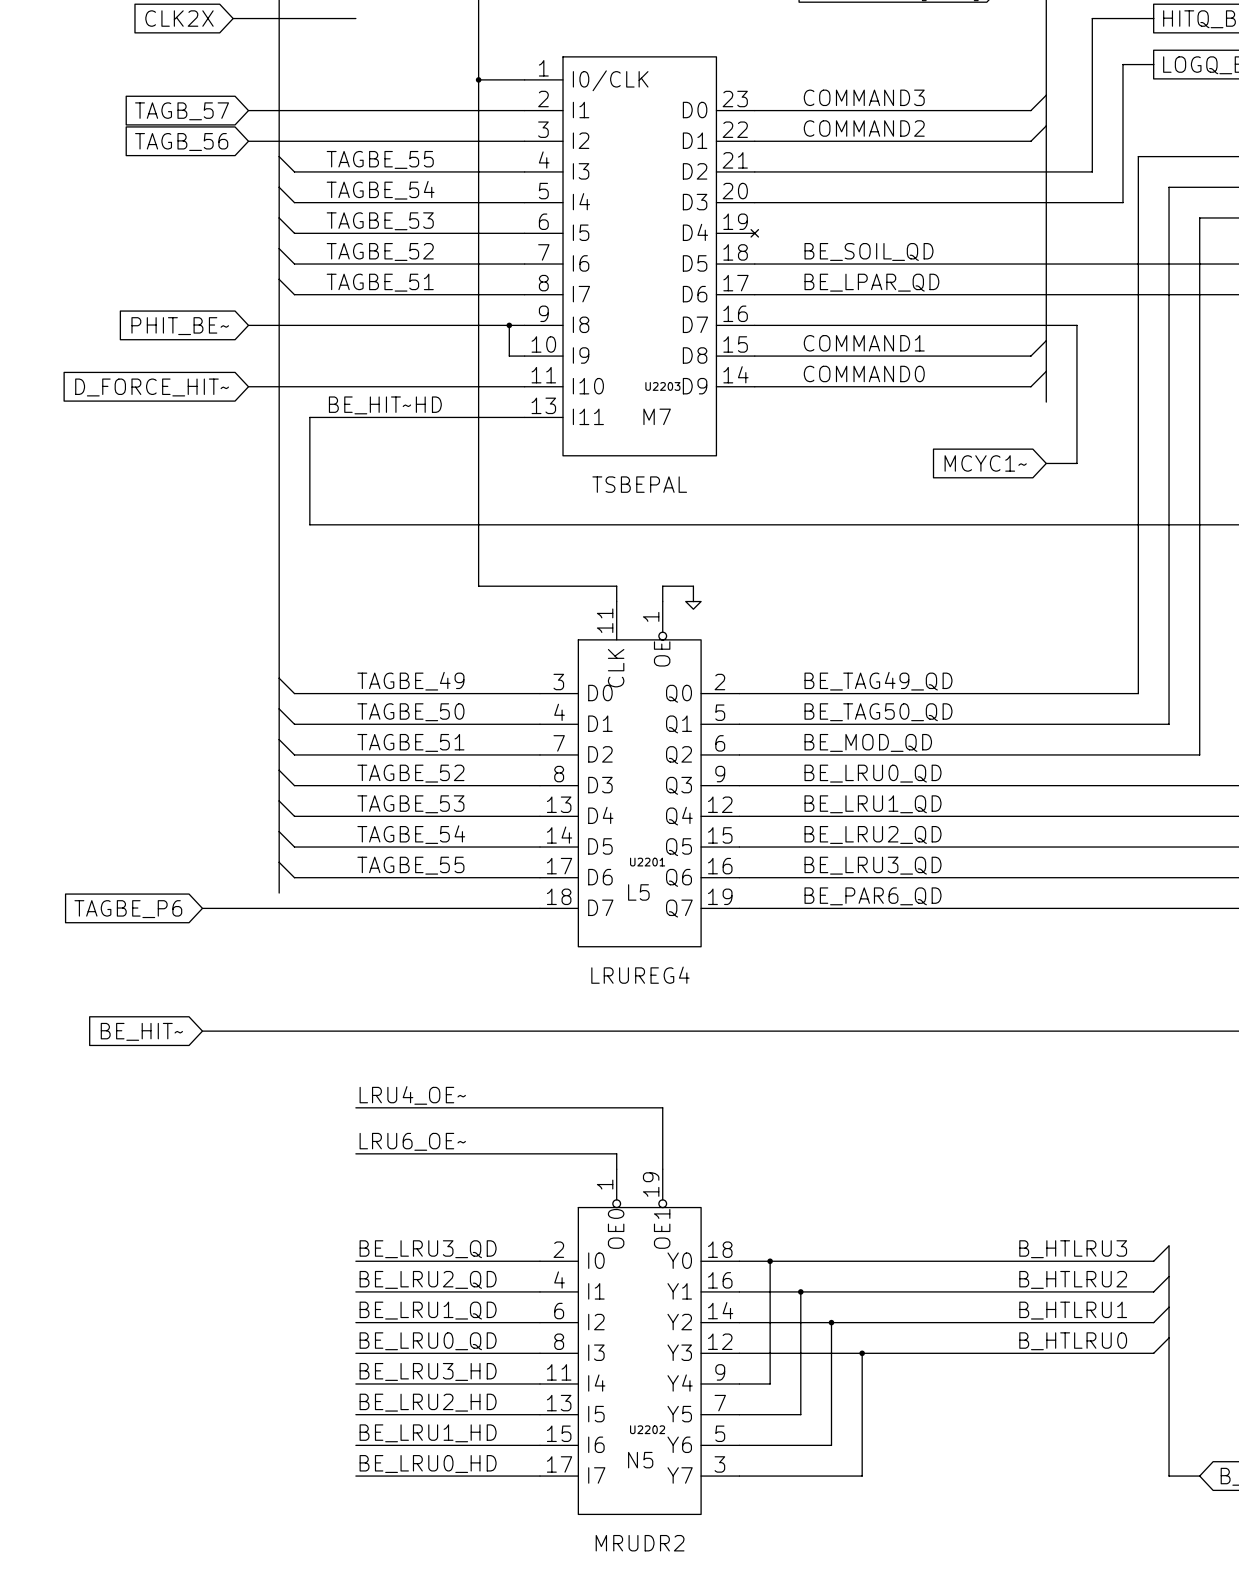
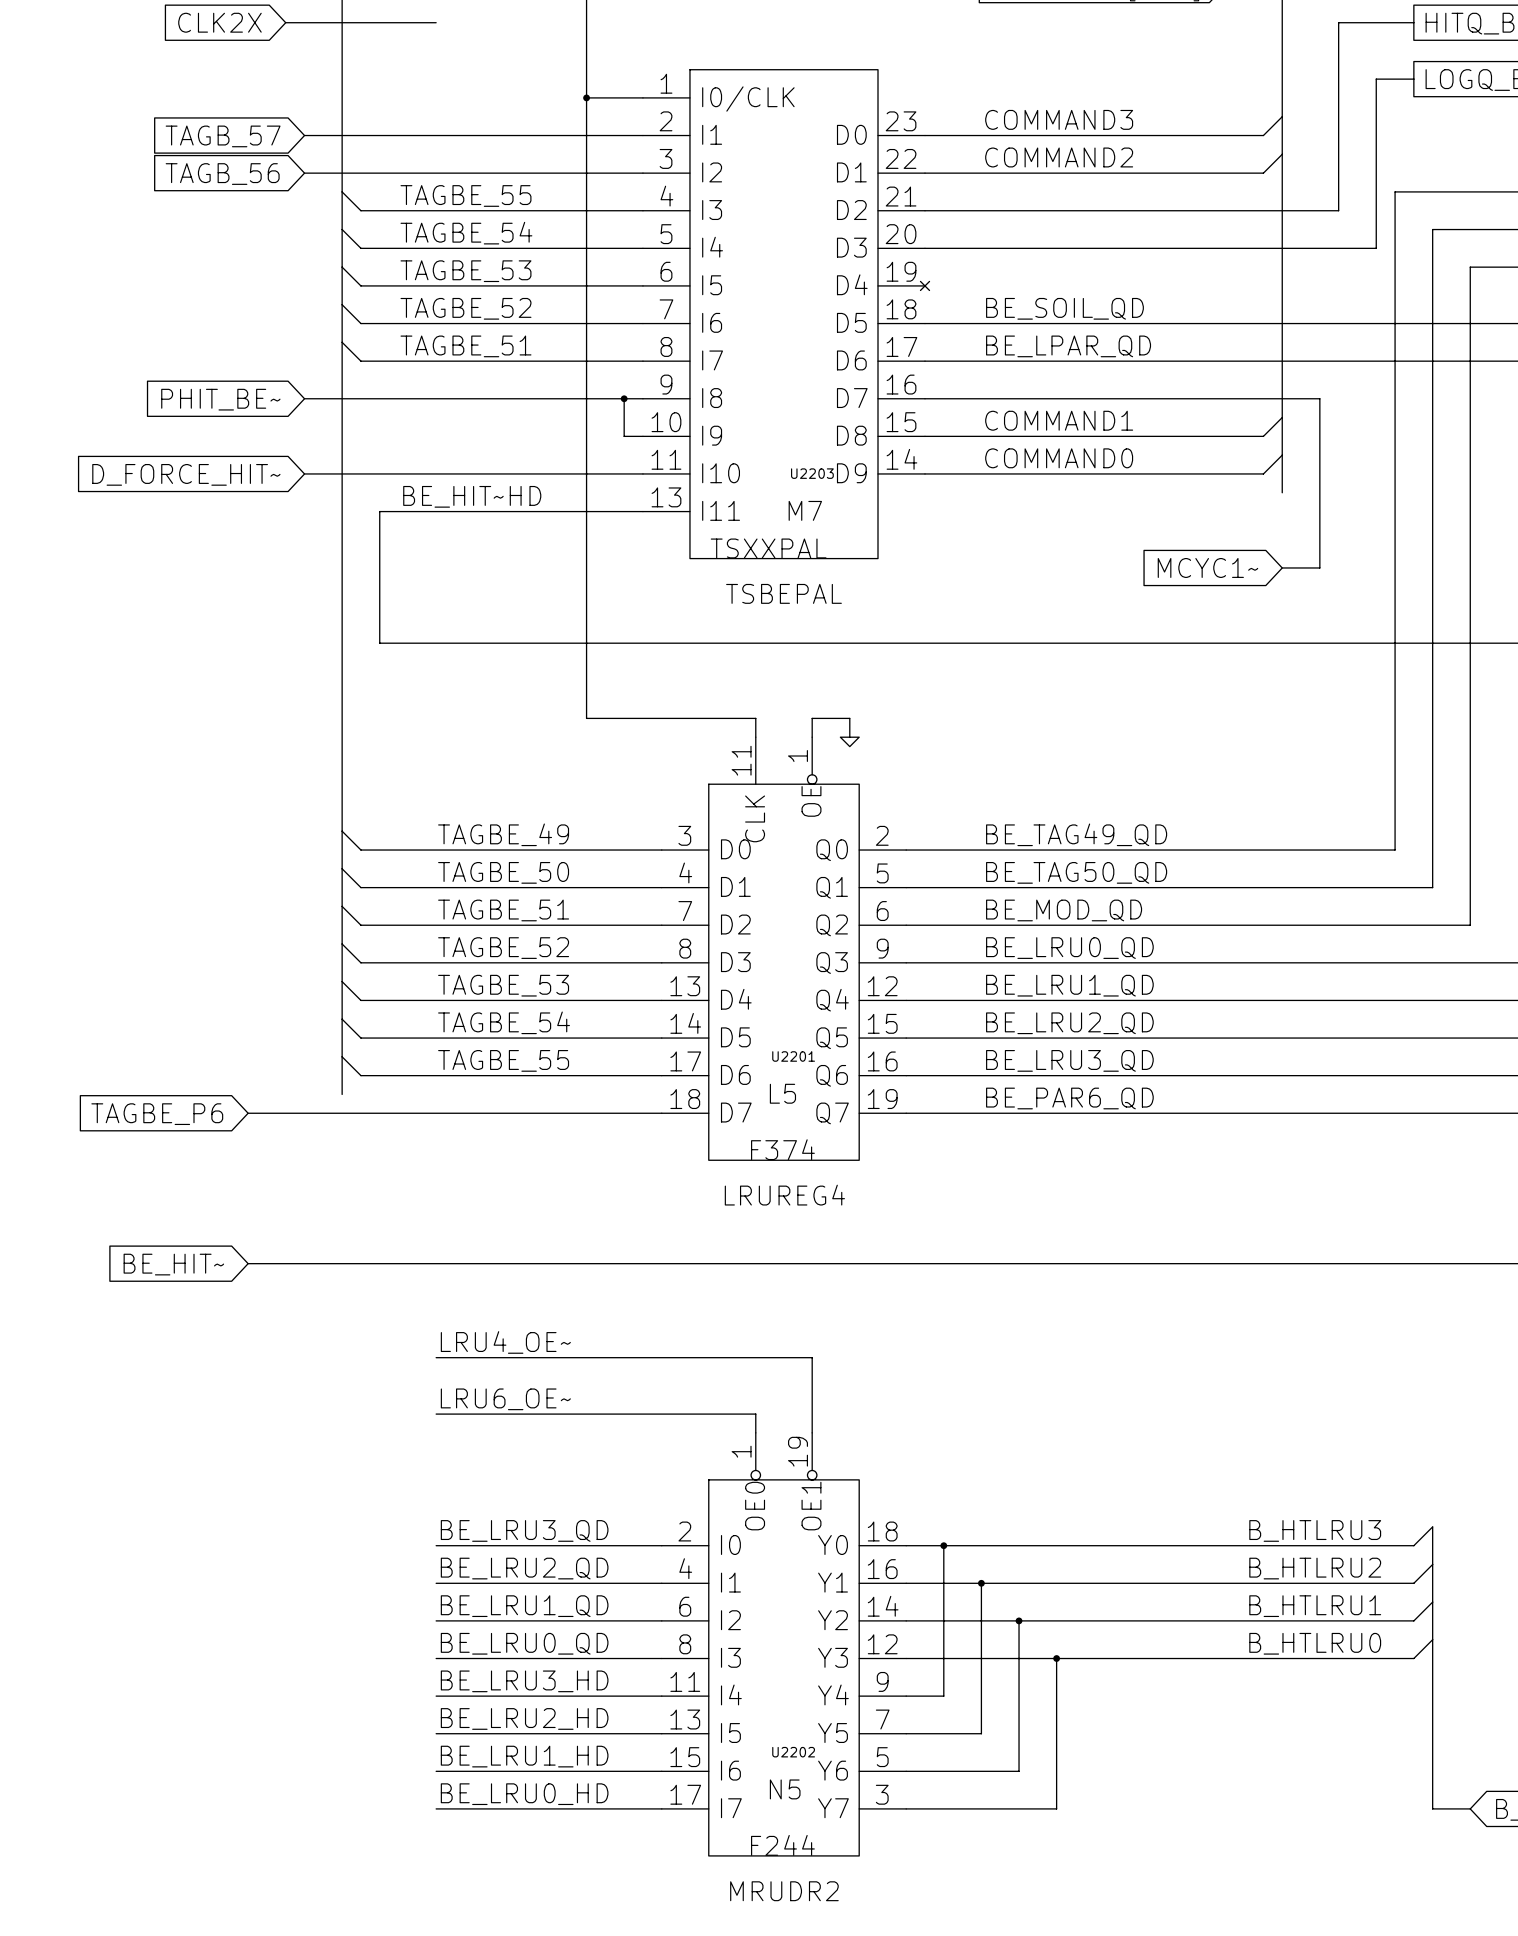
U2203 value: none -> TSXXPAL (768, 548)
U2201 value: none -> F374 (782, 1149)
U2202 value: none -> F244 (782, 1845)

